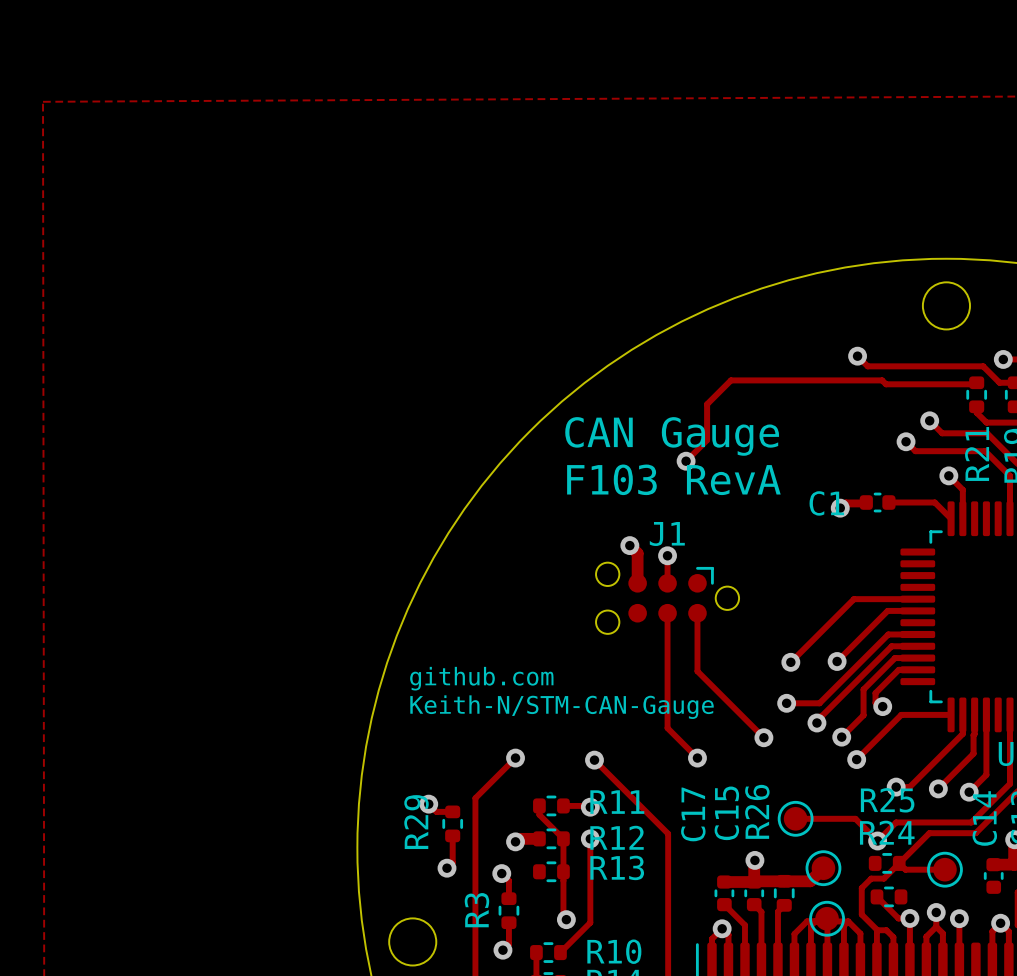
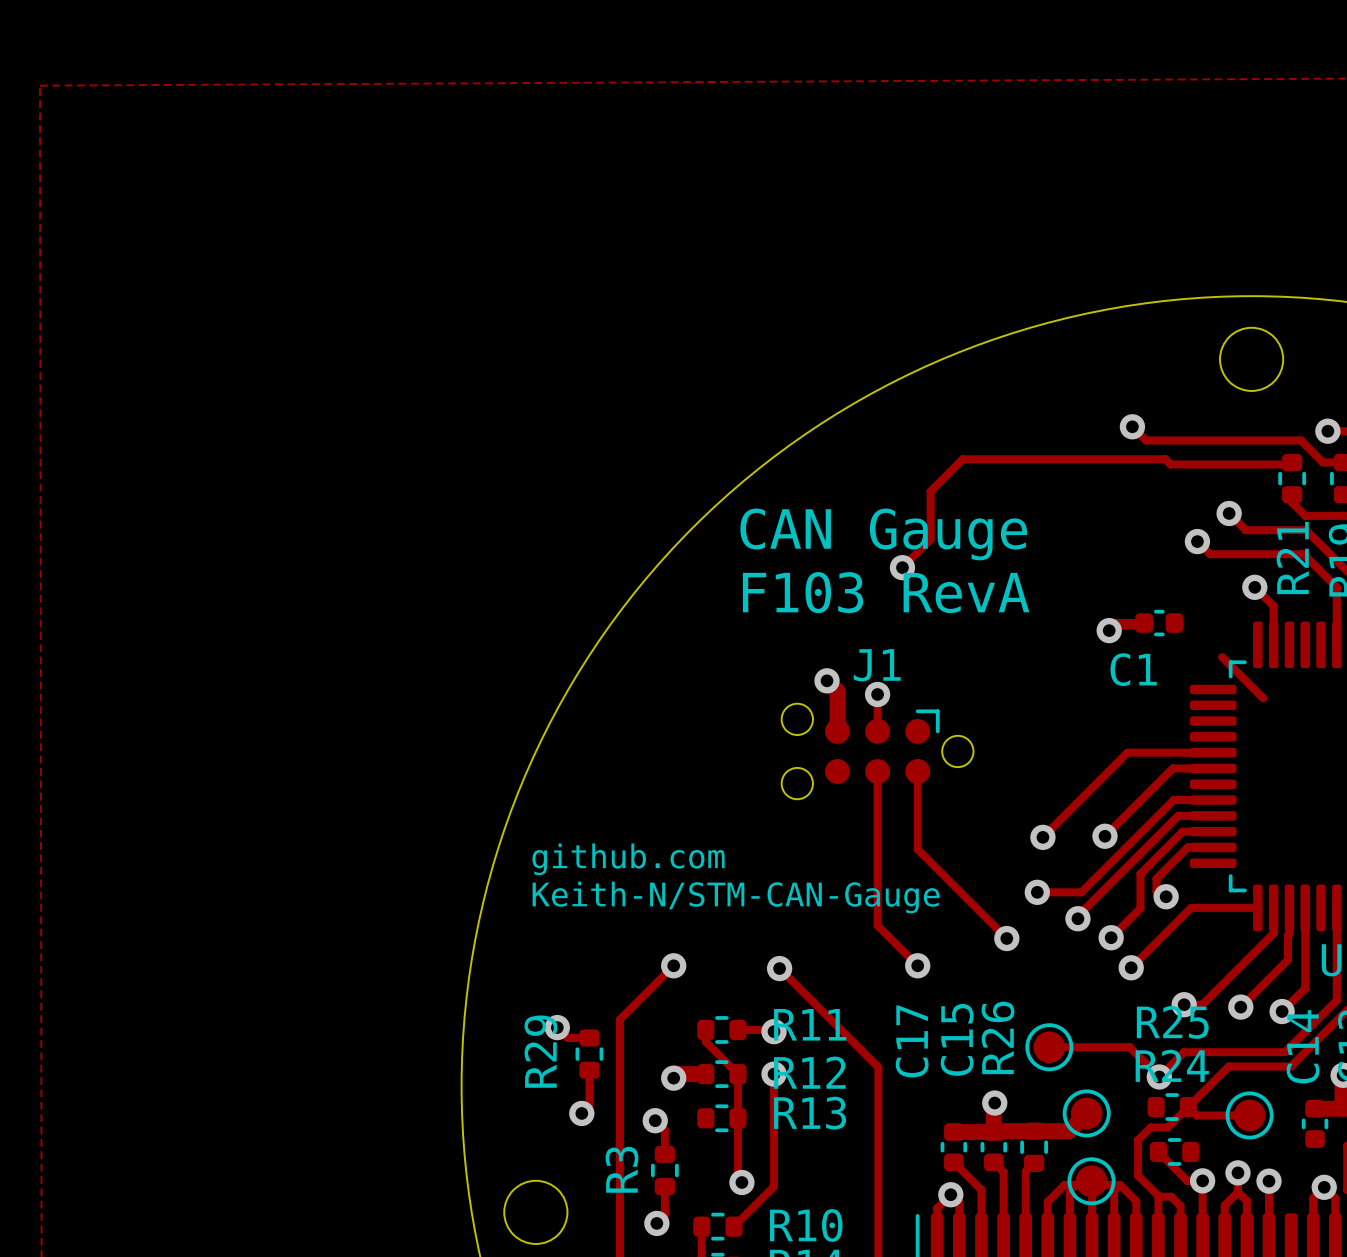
track: (888, 502) (934, 502) (951, 518) -> none
C1 name position: C1 (826, 503) -> C1 (1133, 669)
track: none -> (1222, 657) (1263, 698)

